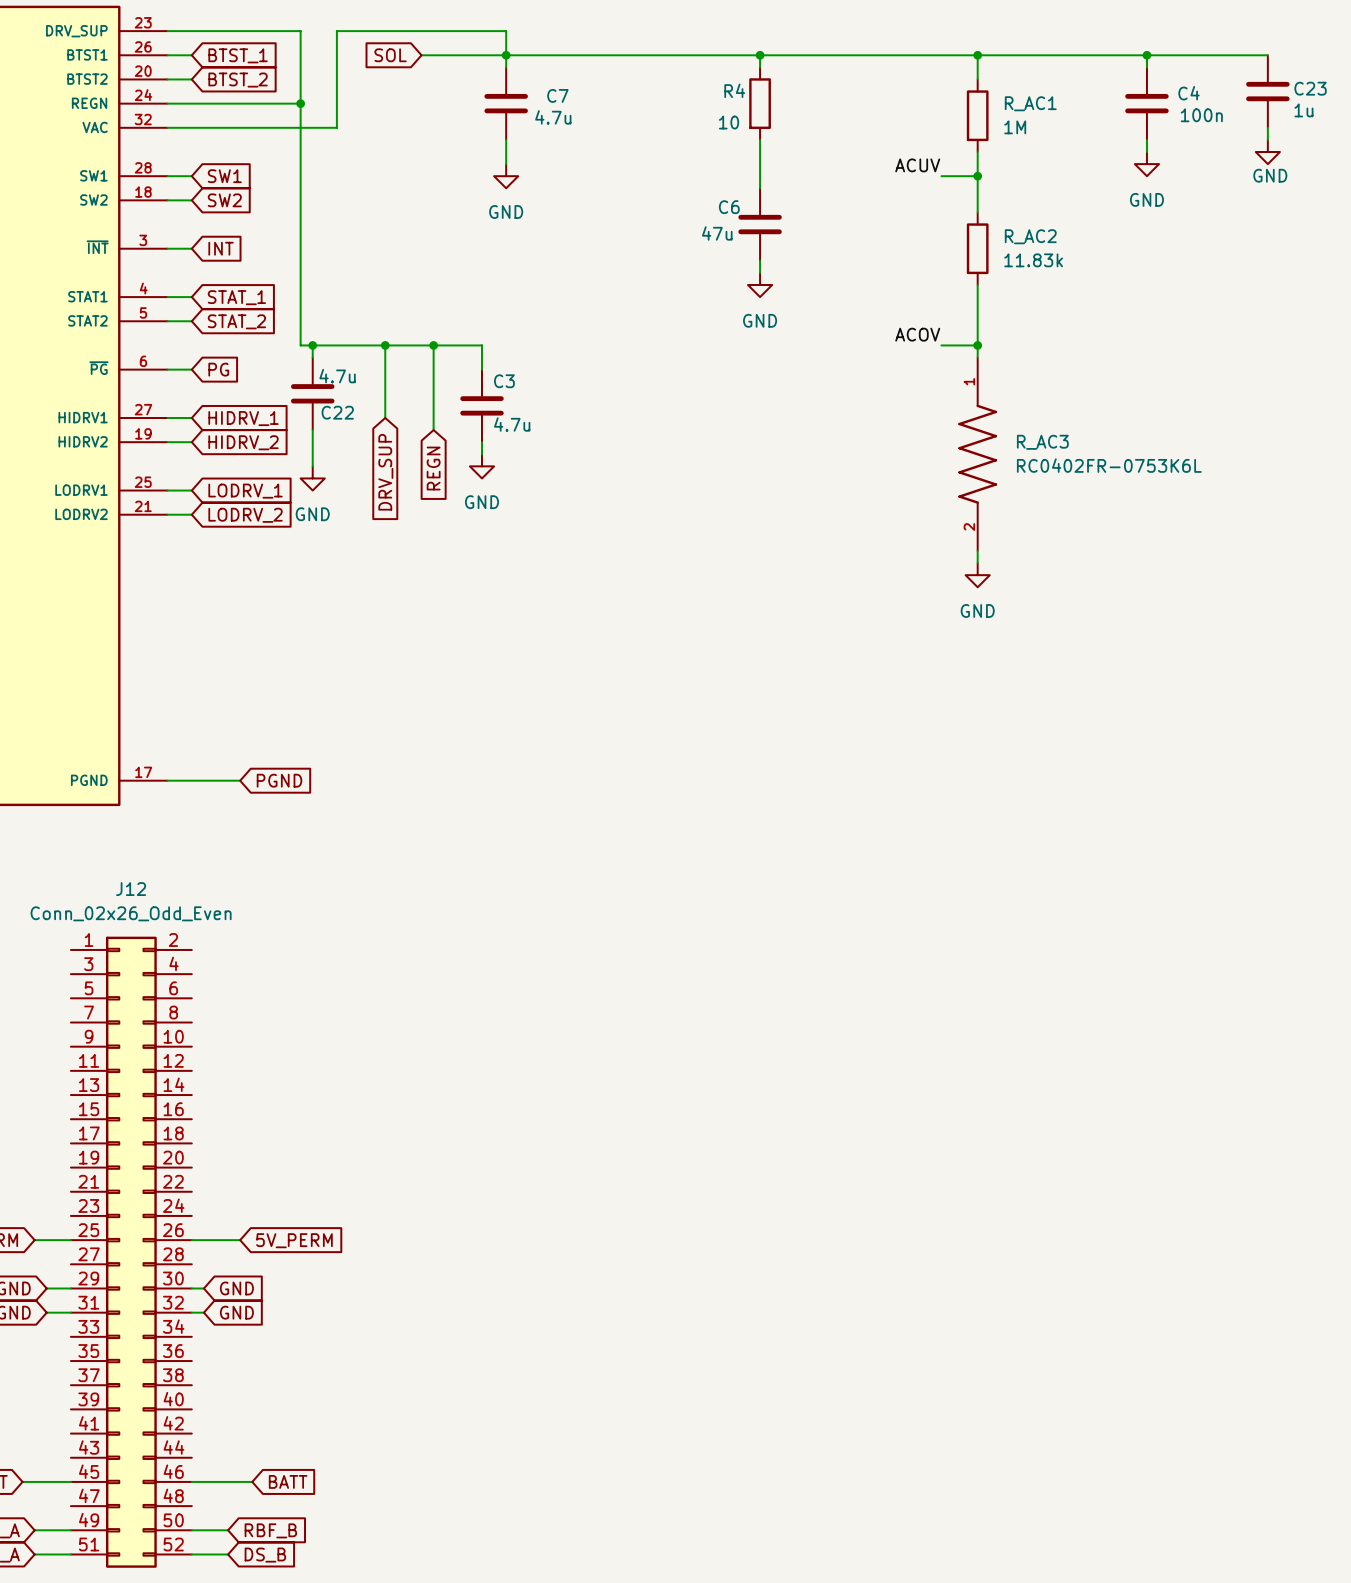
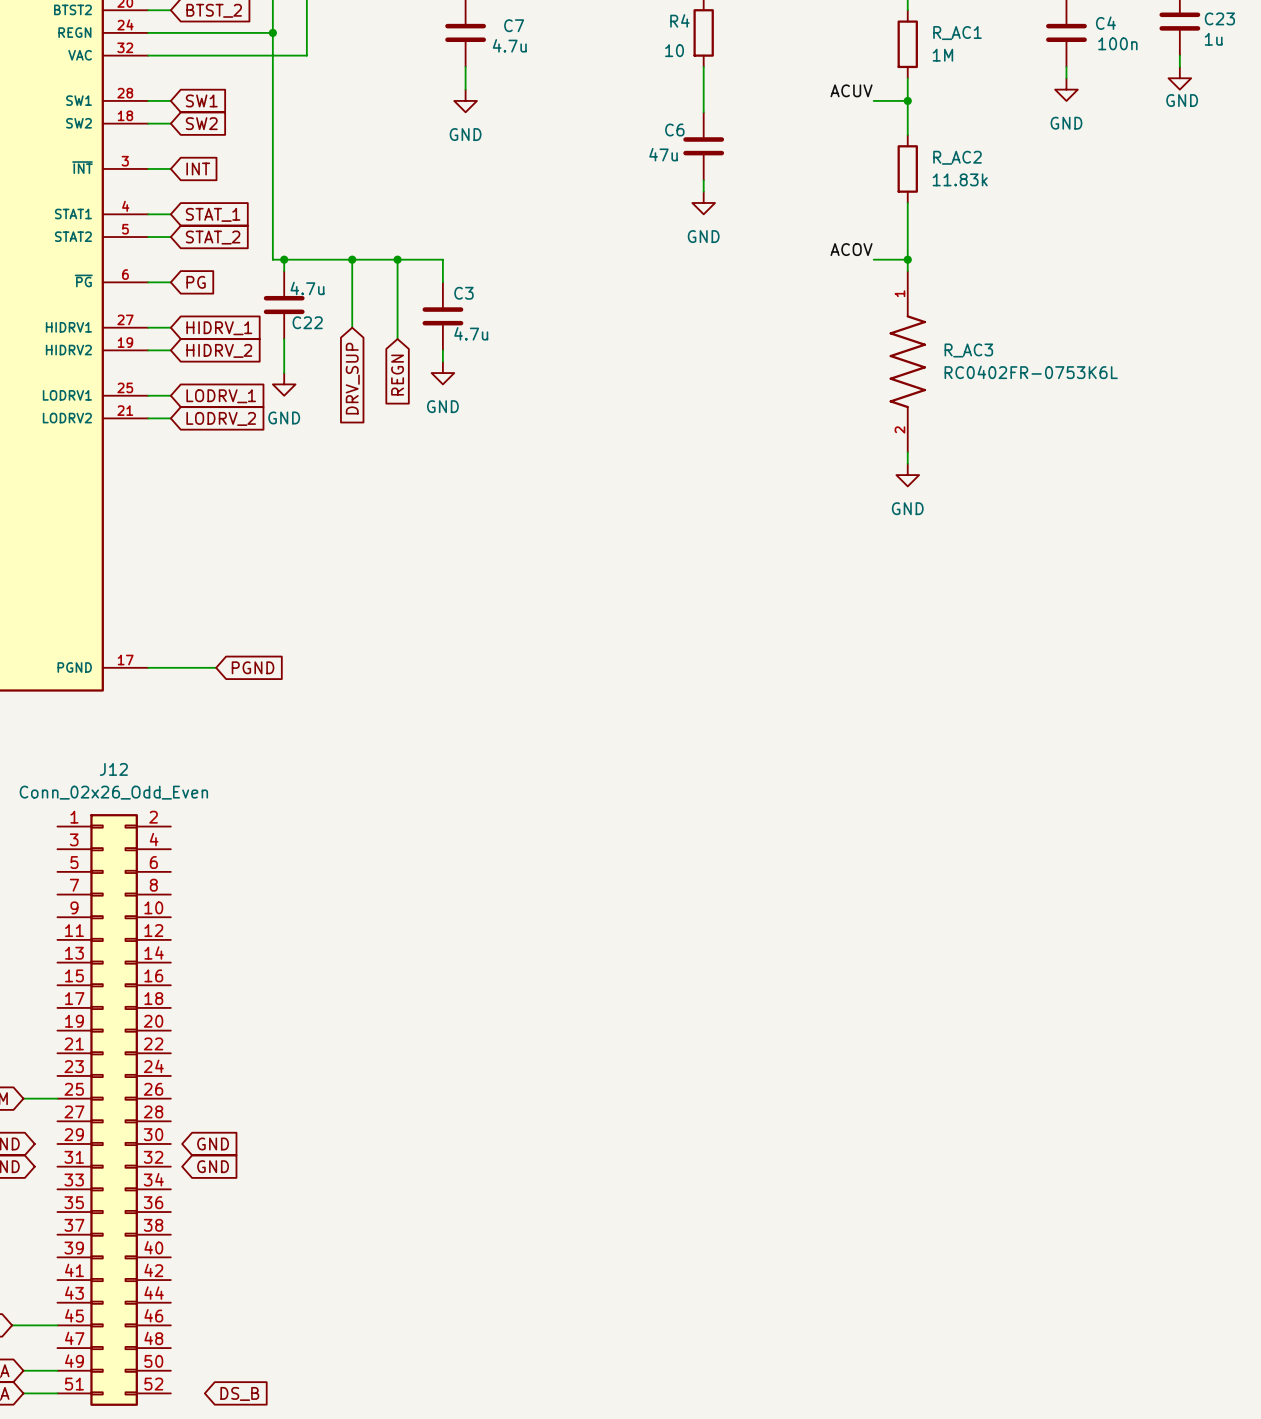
wire: (191, 1240) (240, 1240) -> none
global label: 5V_PERM (294, 1240) -> none
wire: (46, 1288) (70, 1288) -> none
wire: (191, 1288) (203, 1288) -> none
wire: (46, 1312) (70, 1312) -> none
wire: (191, 1312) (203, 1312) -> none
wire: (191, 1481) (252, 1481) -> none
global label: BATT (288, 1481) -> none
wire: (191, 1530) (228, 1530) -> none
global label: RBF_B (270, 1530) -> none
wire: (191, 1554) (228, 1554) -> none

